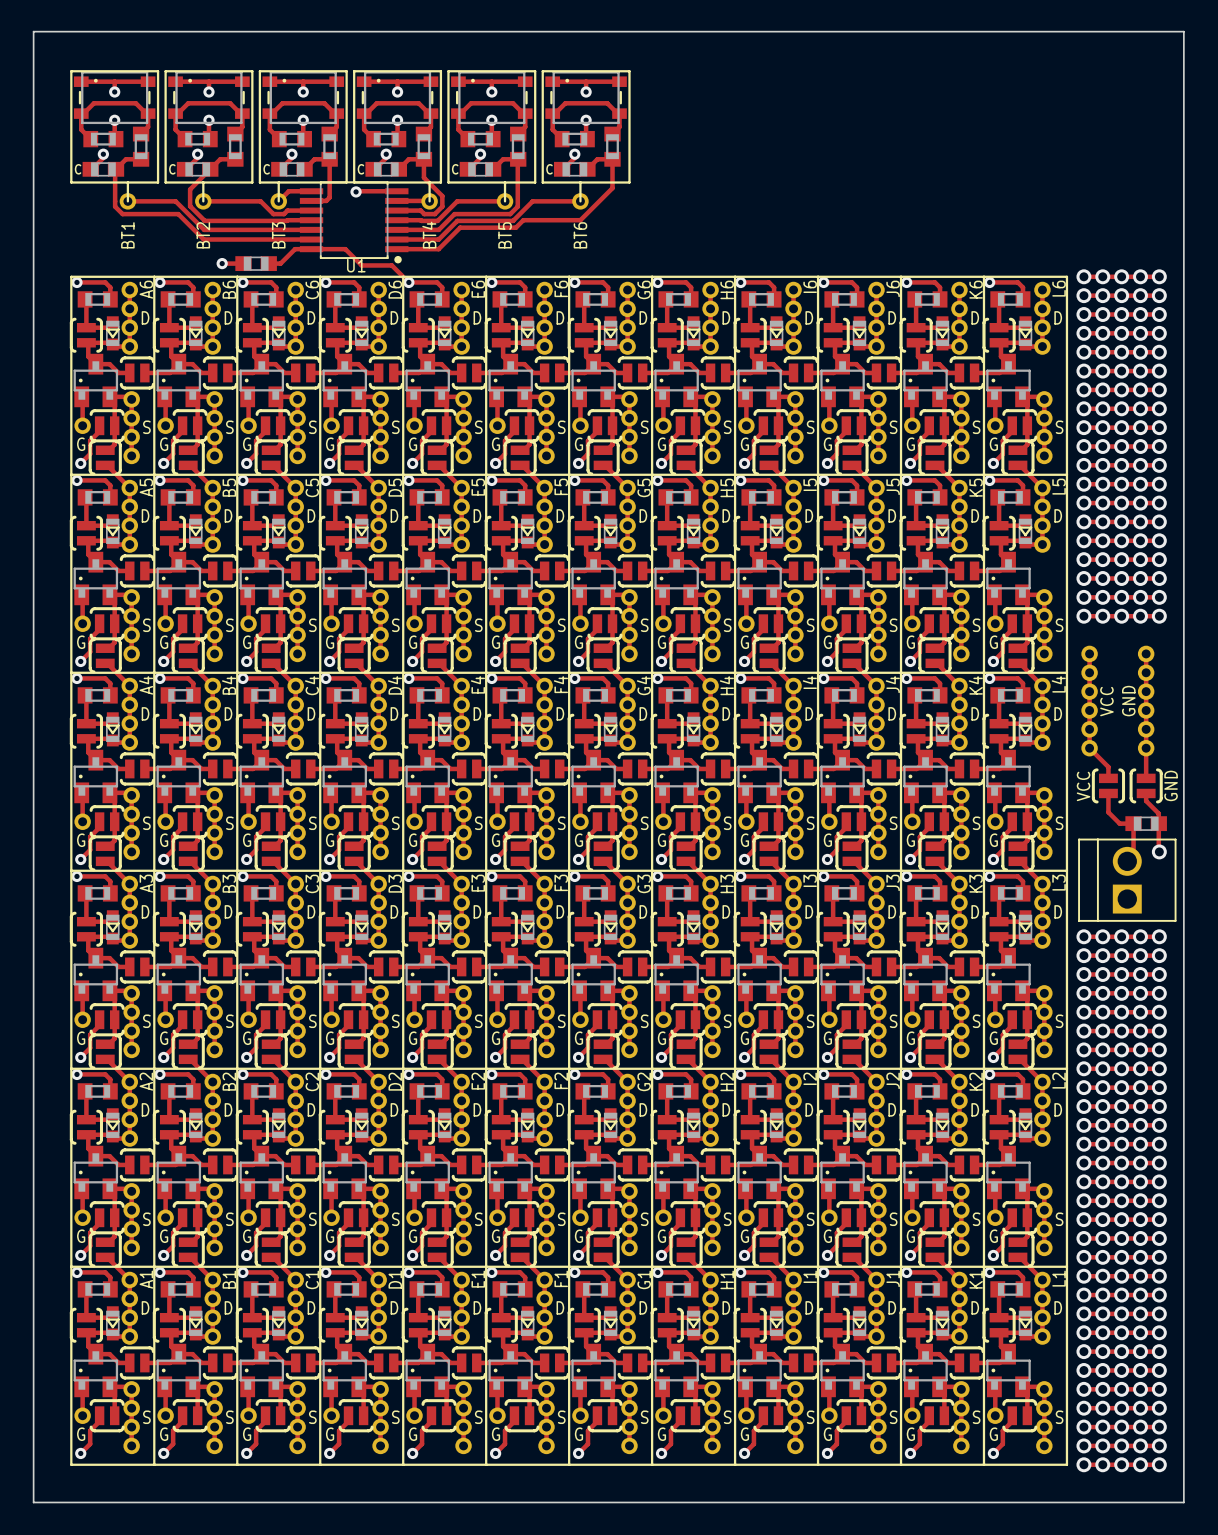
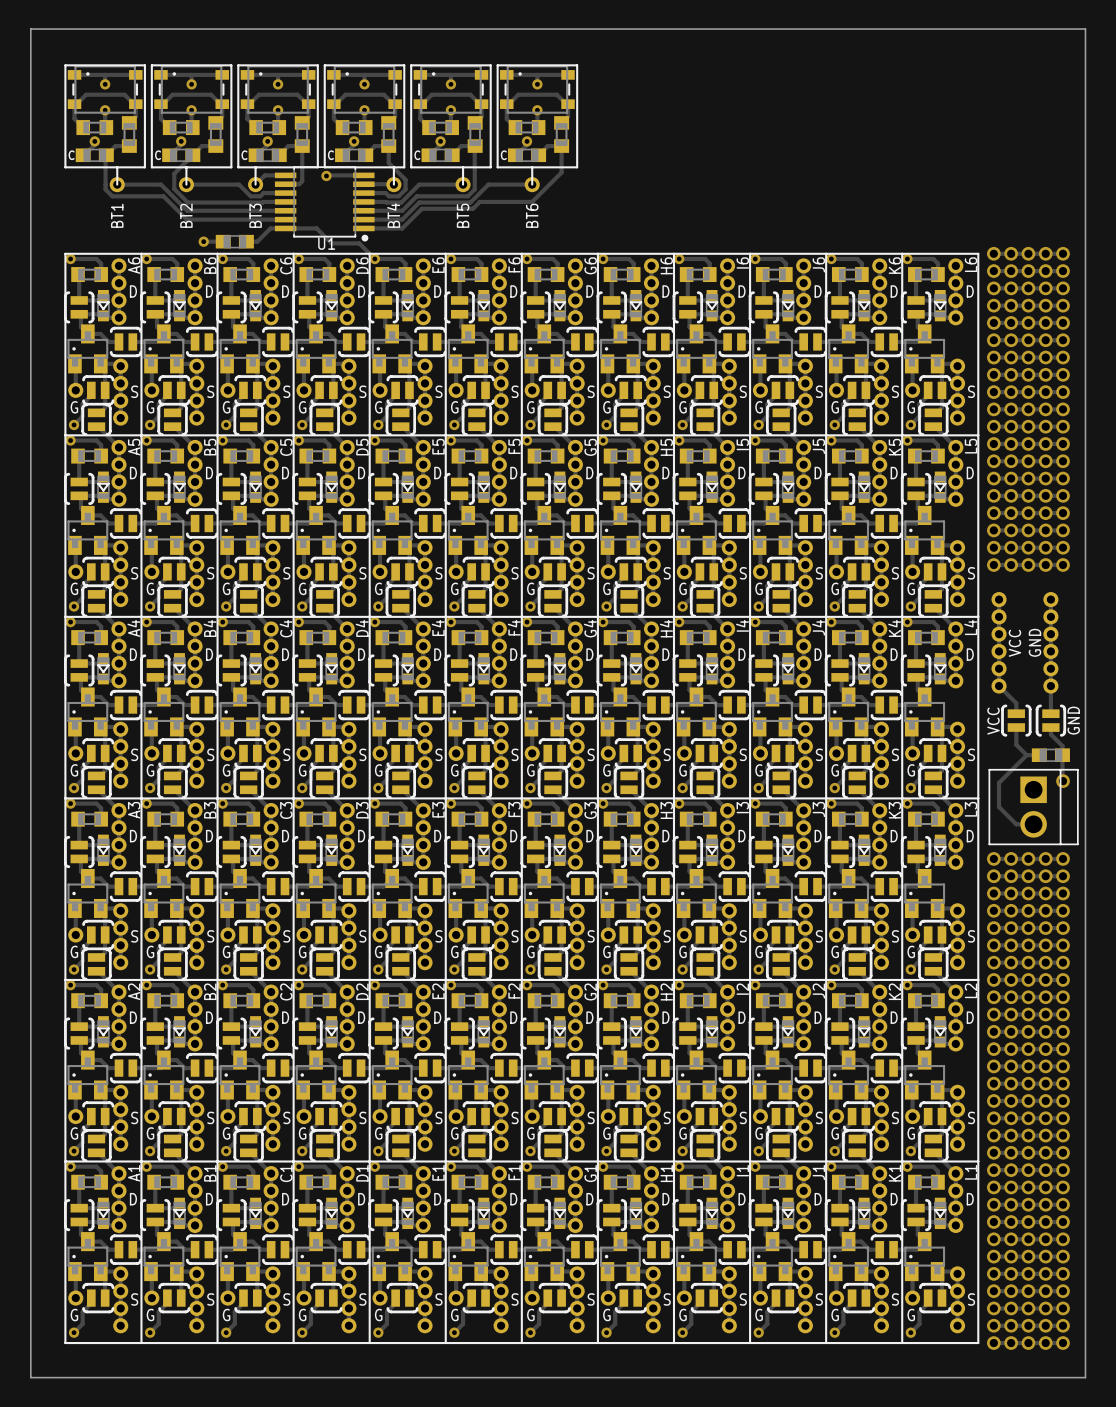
track: none -> (1026, 755) (999, 782) (999, 807) (1016, 824) (1033, 824)
track: (1133, 823) (1133, 855) (1127, 861) -> none
part rotation: 0° (1127, 880) -> 180° (1033, 807)

